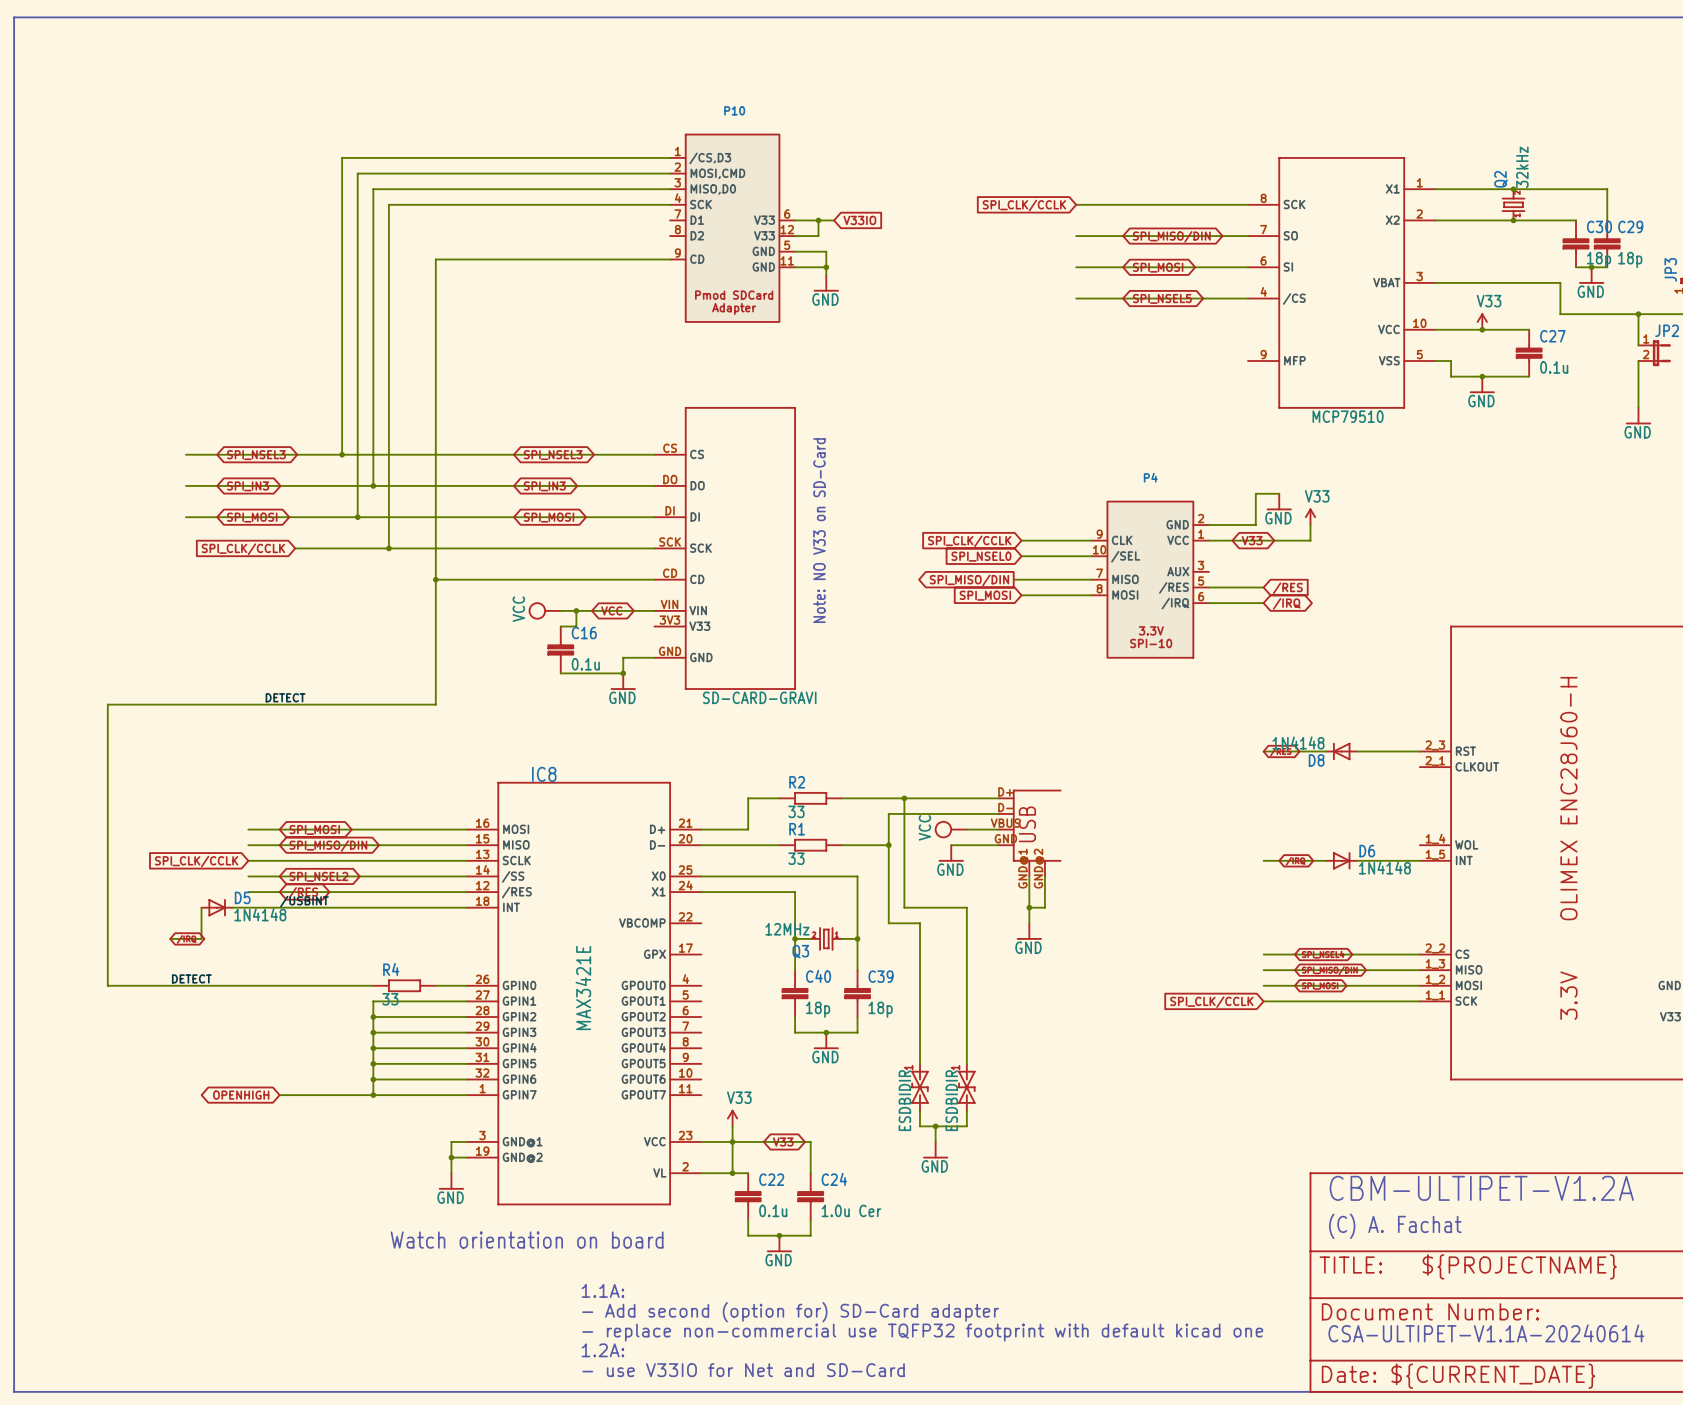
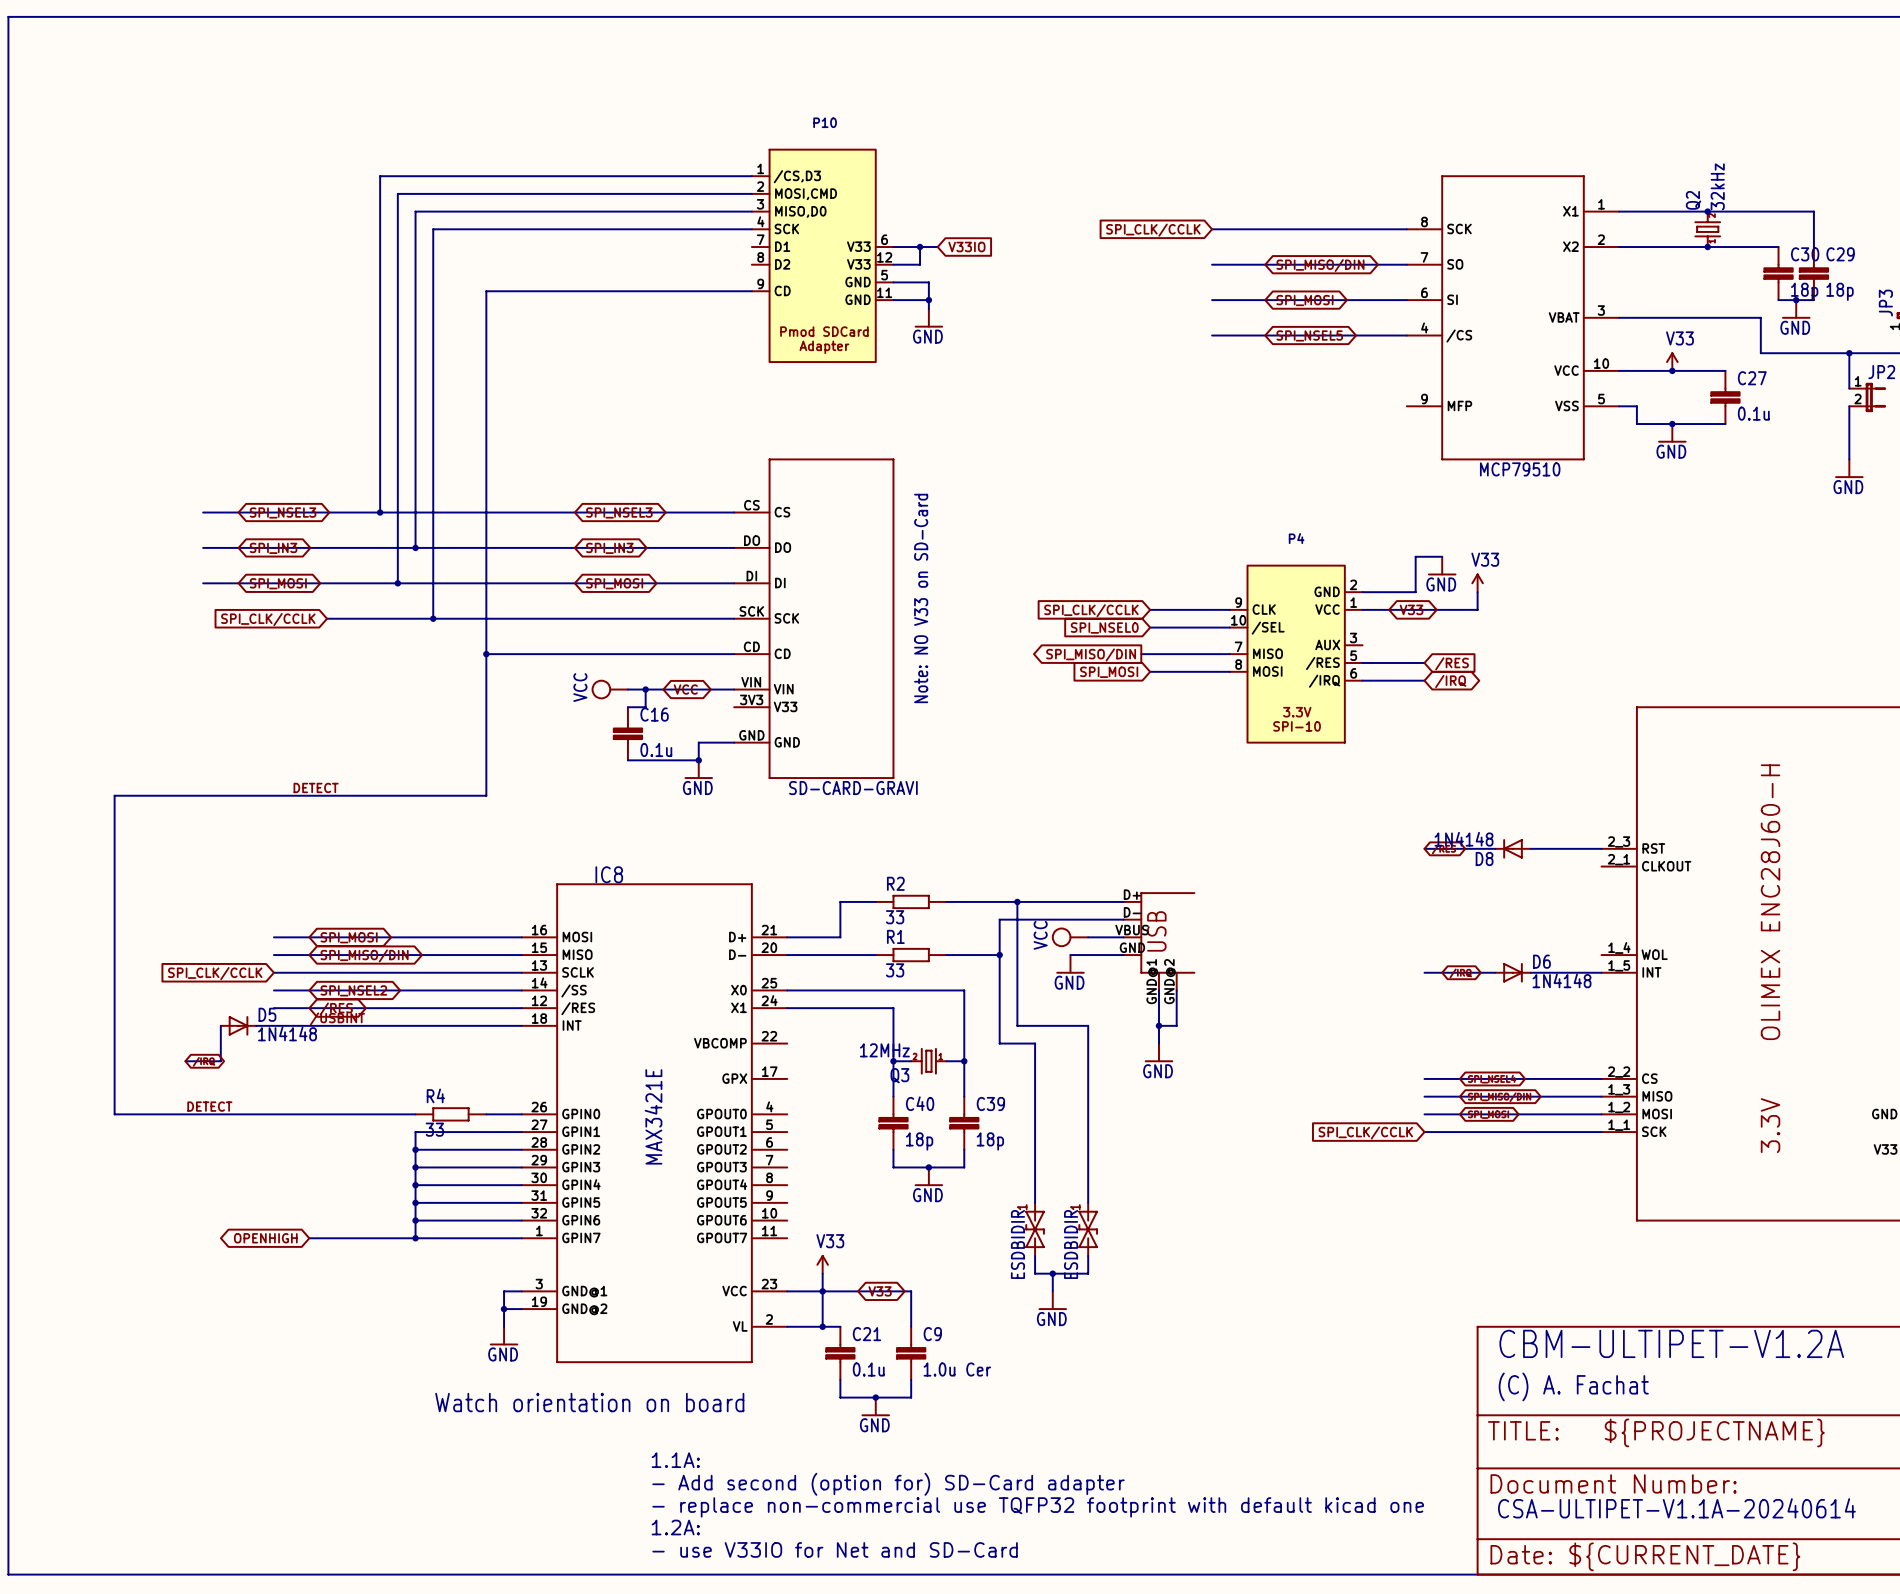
C22 name: C22 (771, 1179) -> C21 (866, 1334)
C24 name: C24 (834, 1179) -> C9 (932, 1334)

